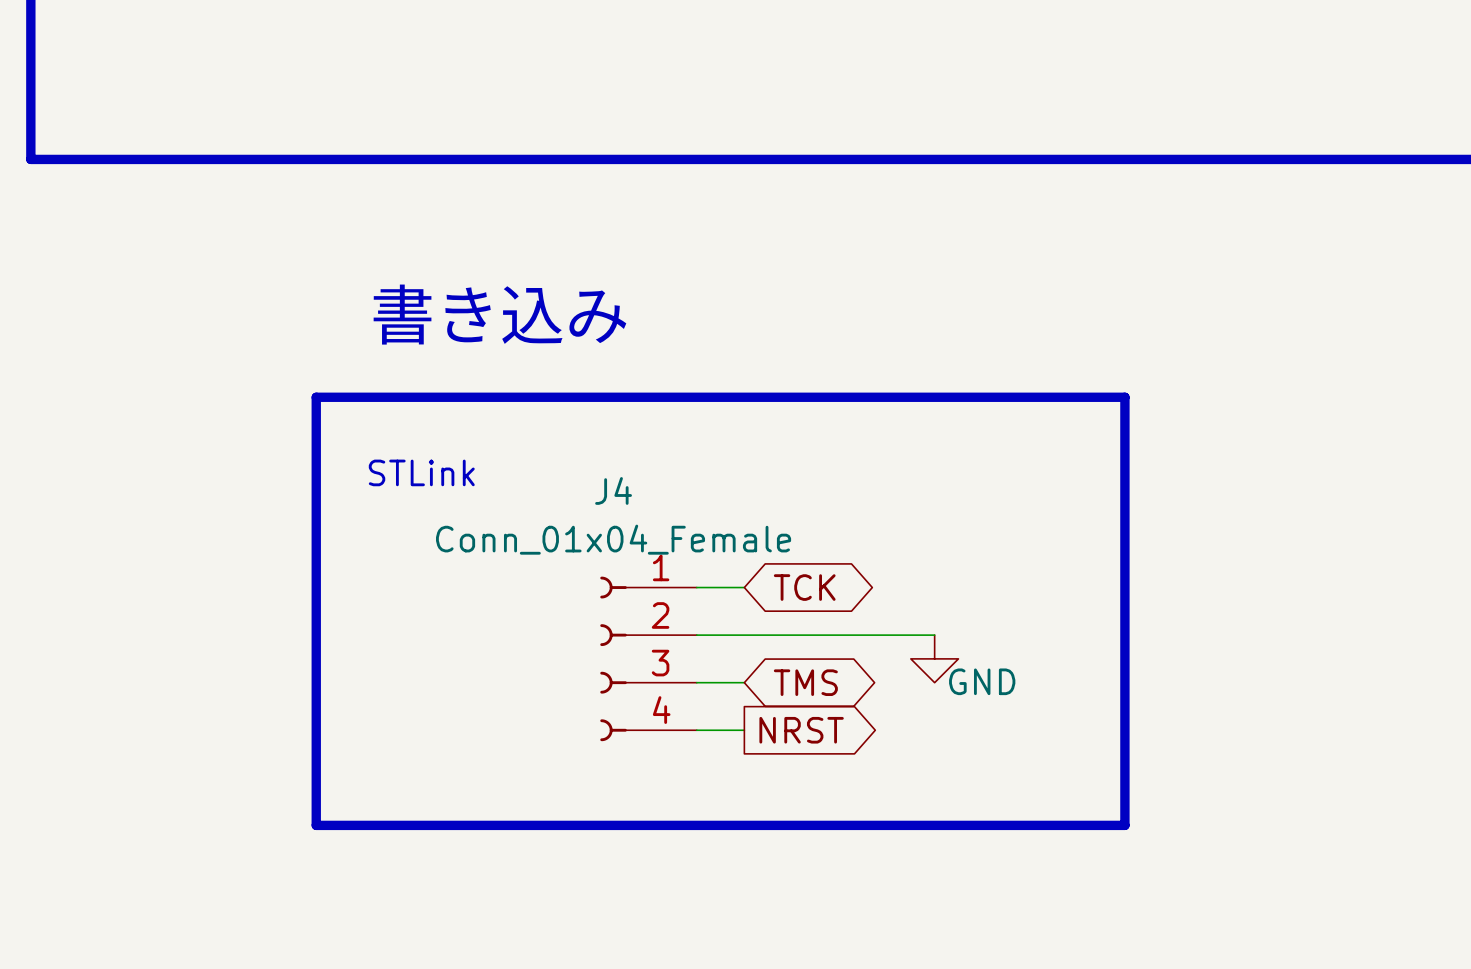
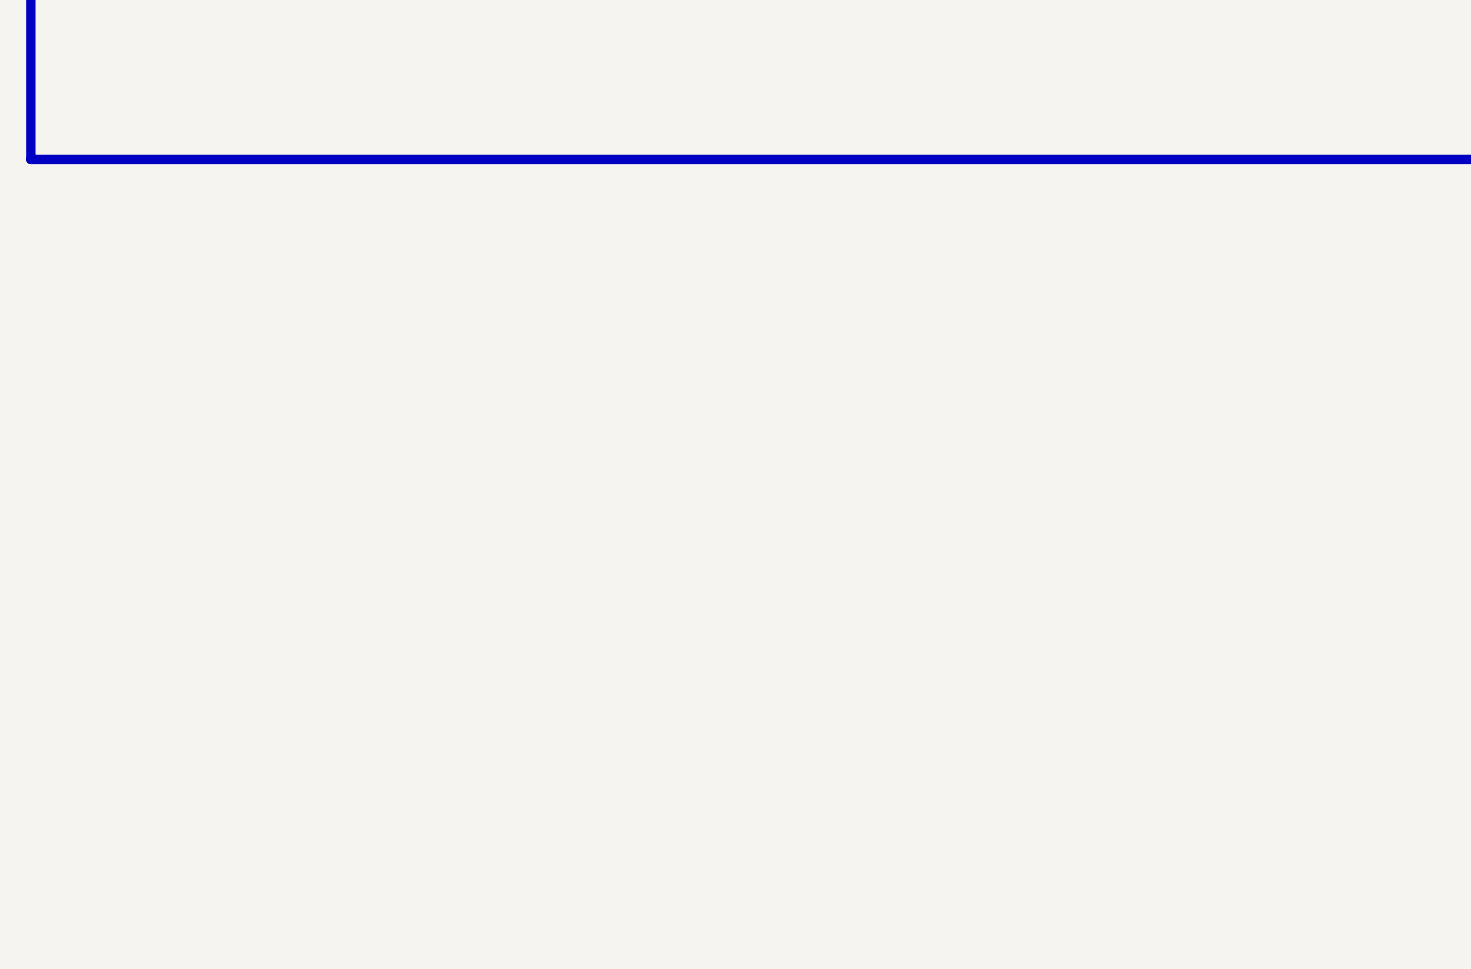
text: 書き込み (499, 314) -> none
line: (316, 397) (316, 825) (1124, 825) (1124, 397) (316, 397) -> none
text: STLink (421, 472) -> none
wire: (696, 587) (744, 587) -> none
global label: TCK (804, 587) -> none
wire: (696, 635) (934, 635) -> none
J4: Conn_01x04_Female (648, 658) -> none
power symbol: GND (934, 658) -> none
wire: (696, 682) (744, 682) -> none
global label: TMS (805, 682) -> none
wire: (696, 730) (744, 730) -> none
global label: NRST (801, 730) -> none

